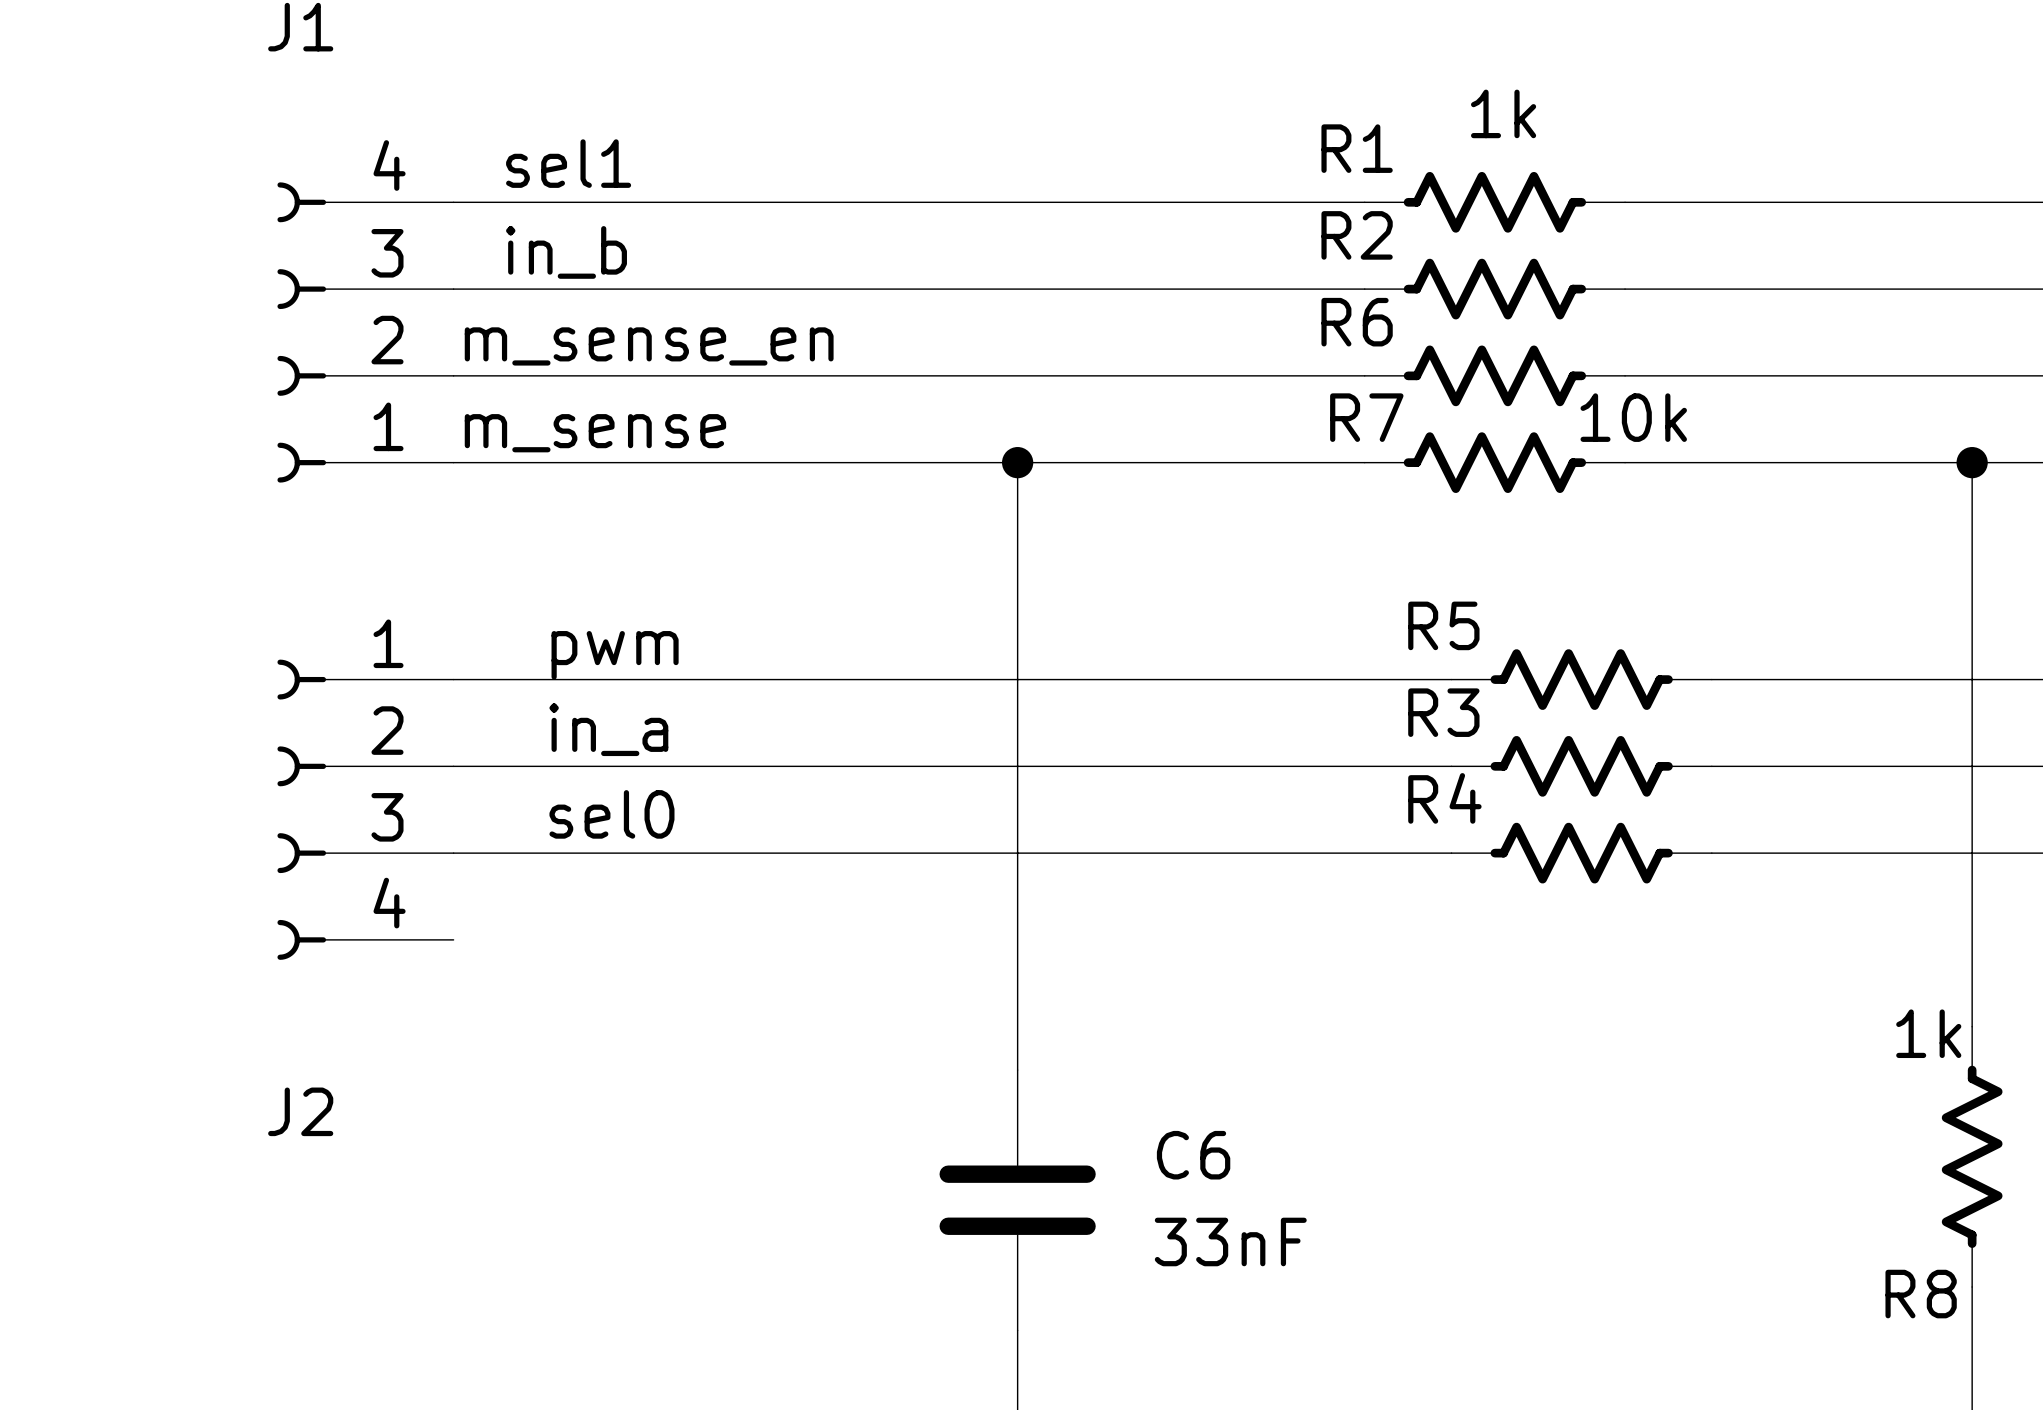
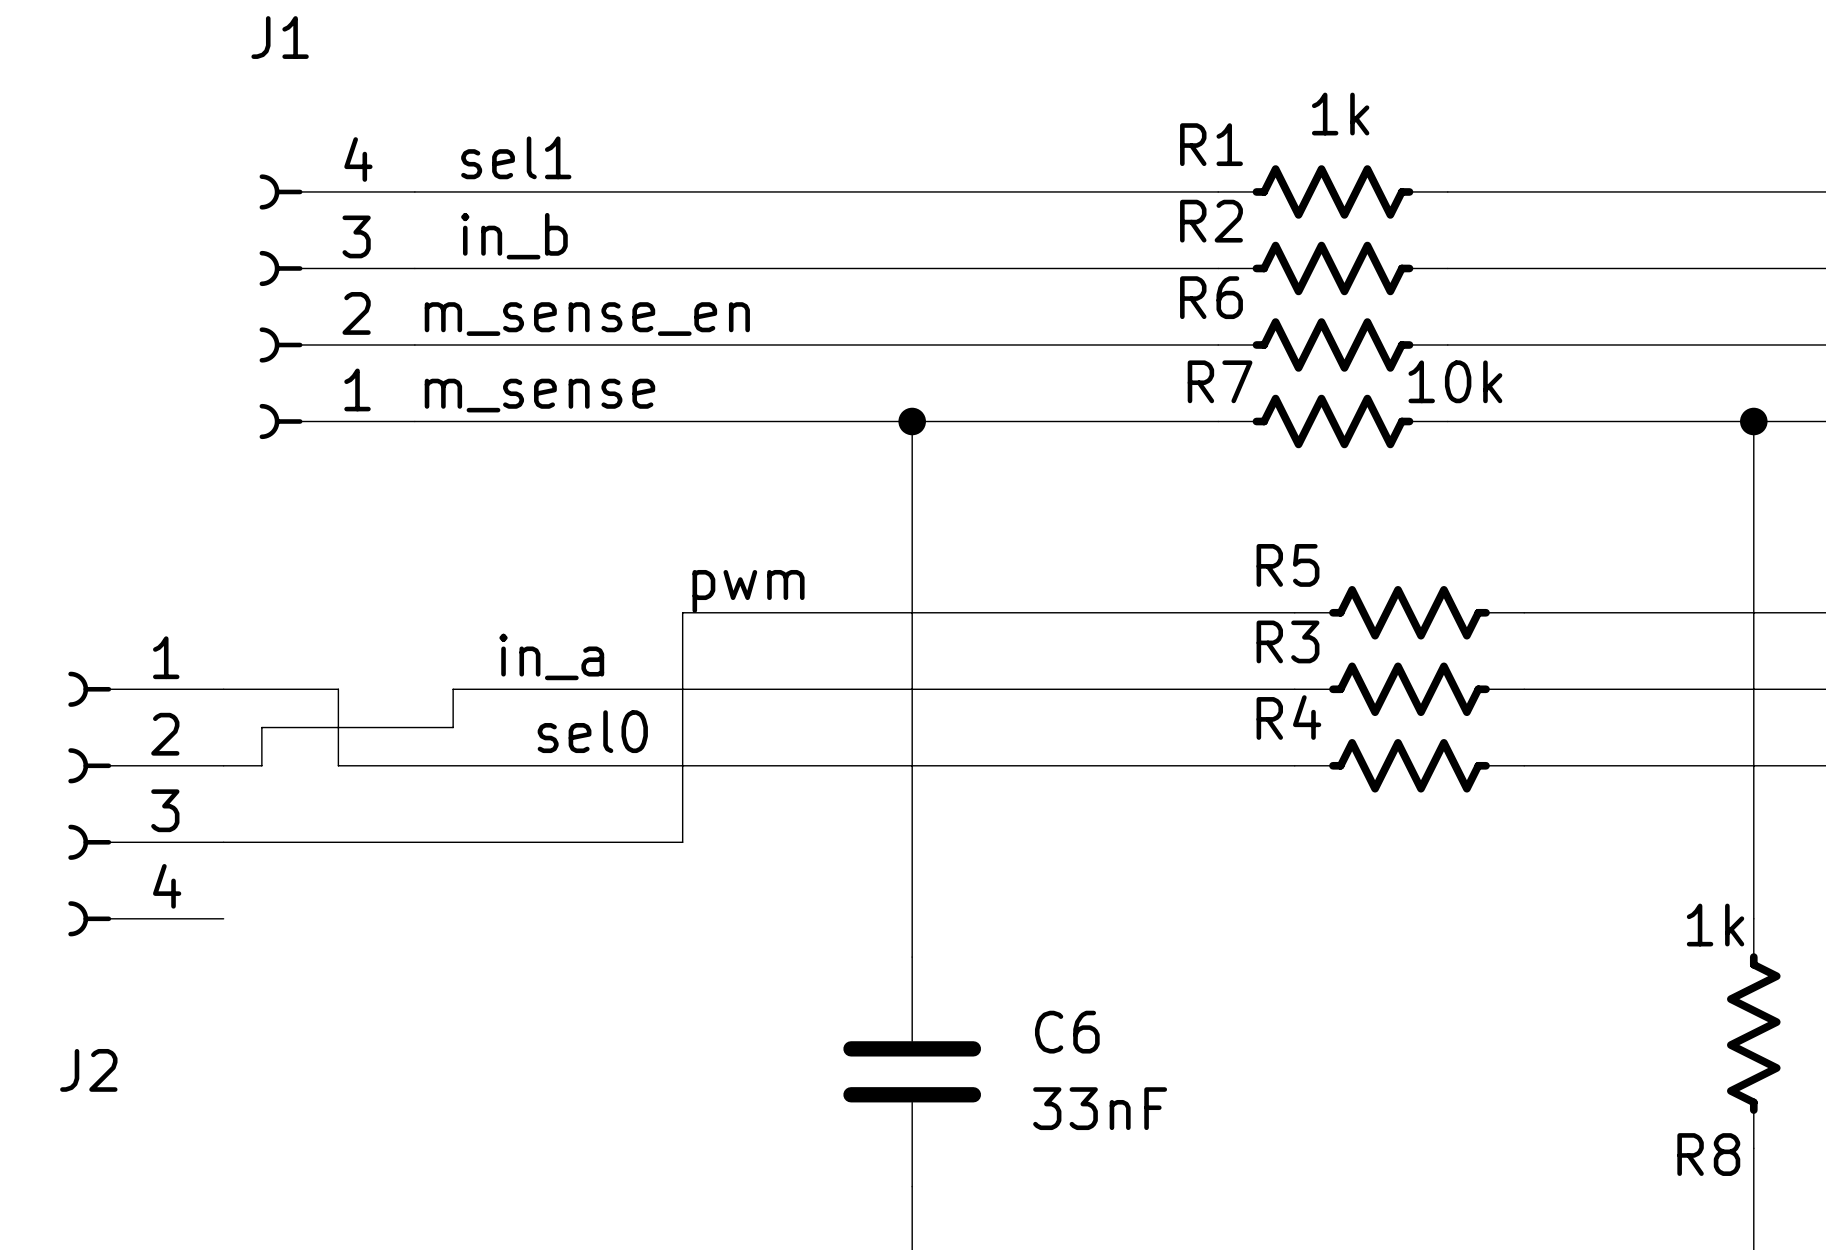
label position: pwm (615, 655) -> pwm (748, 591)
wire: (453, 679) (757, 679) -> (223, 842) (682, 842) (682, 612)
wire: none -> (223, 689) (338, 689) (338, 765) (414, 765)
wire: (453, 766) (496, 766) -> (223, 765) (261, 765) (261, 727) (453, 727) (453, 689)
J2 position: (365, 809) -> (145, 804)
label position: sel0 (611, 814) -> sel0 (592, 731)

